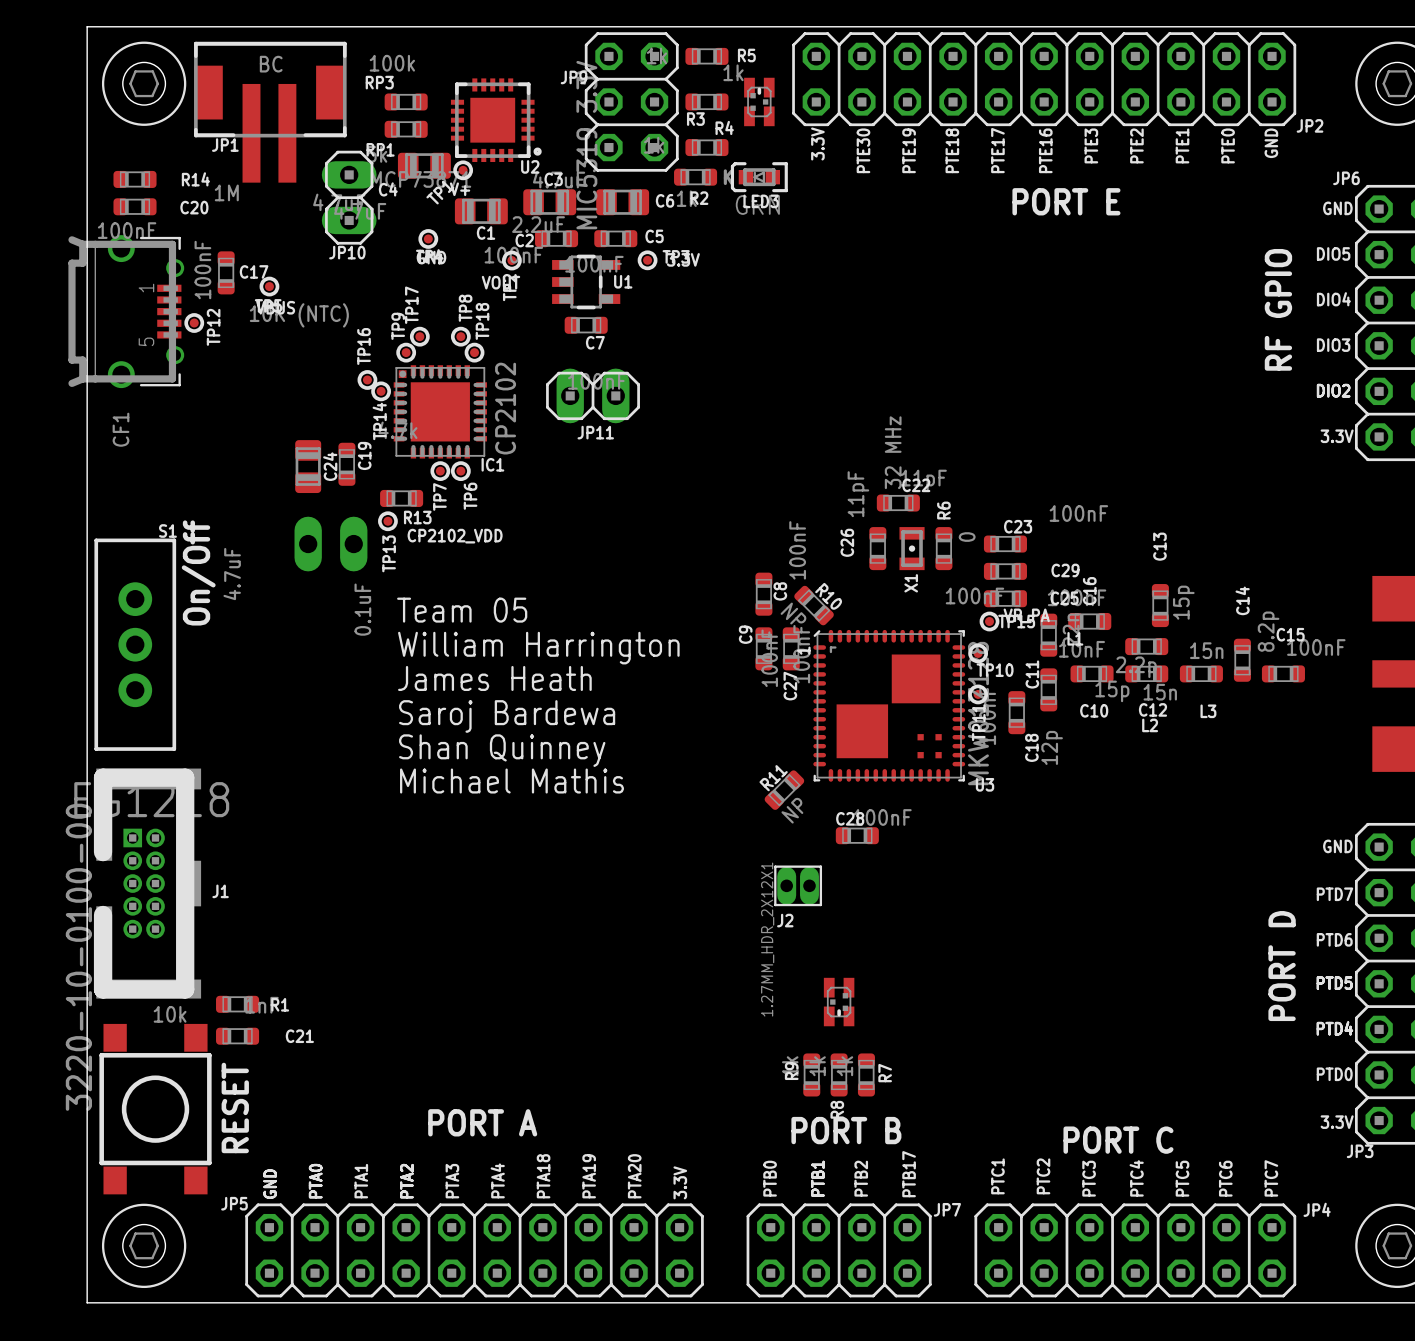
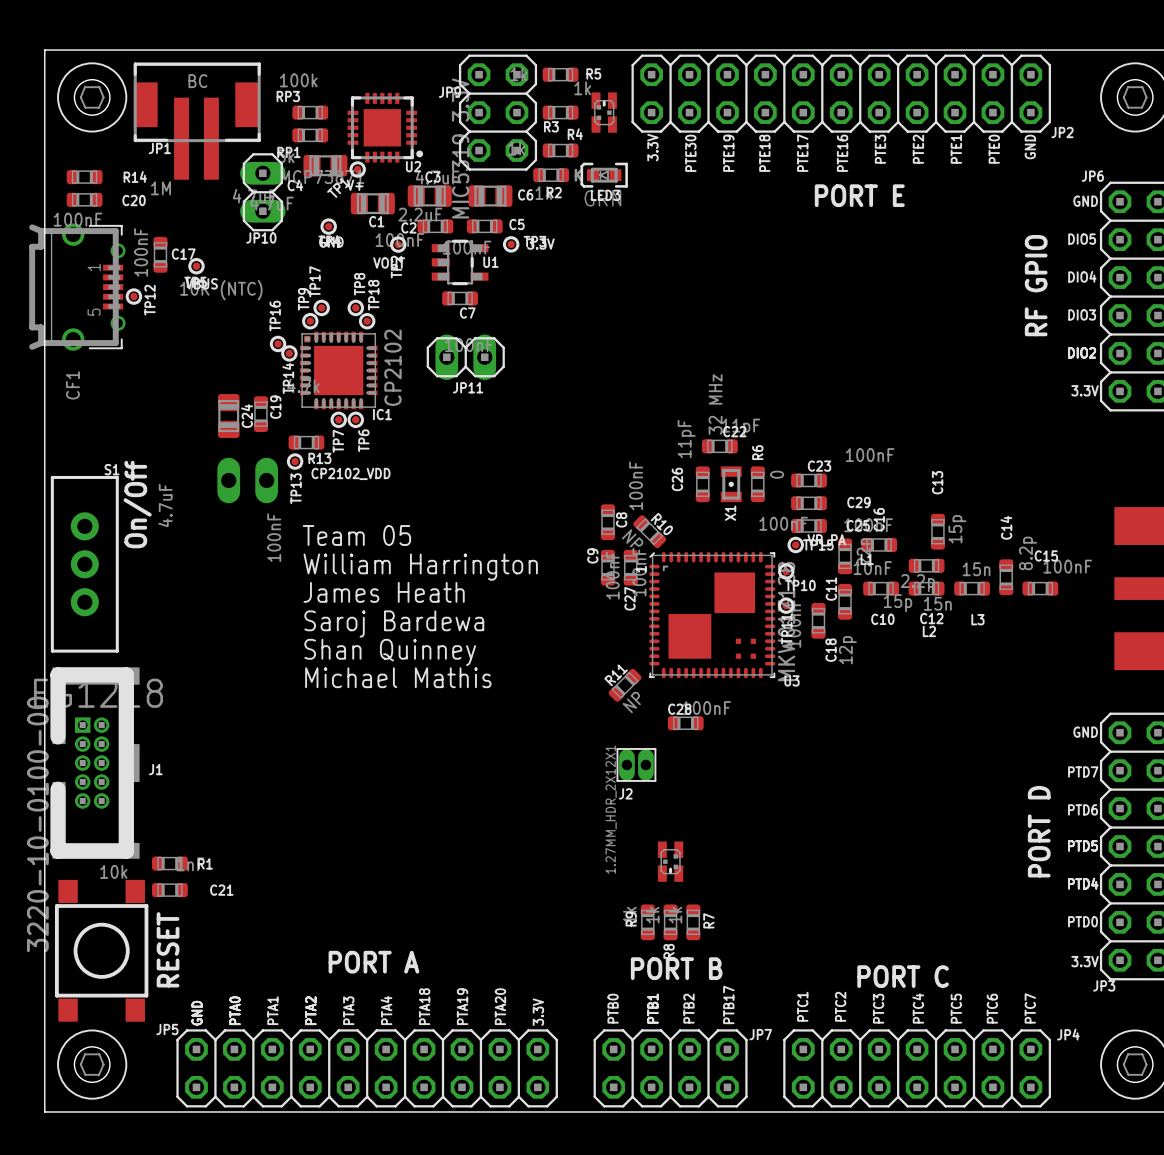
C19 value: 0.1uF (362, 609) -> 100nF (274, 537)

